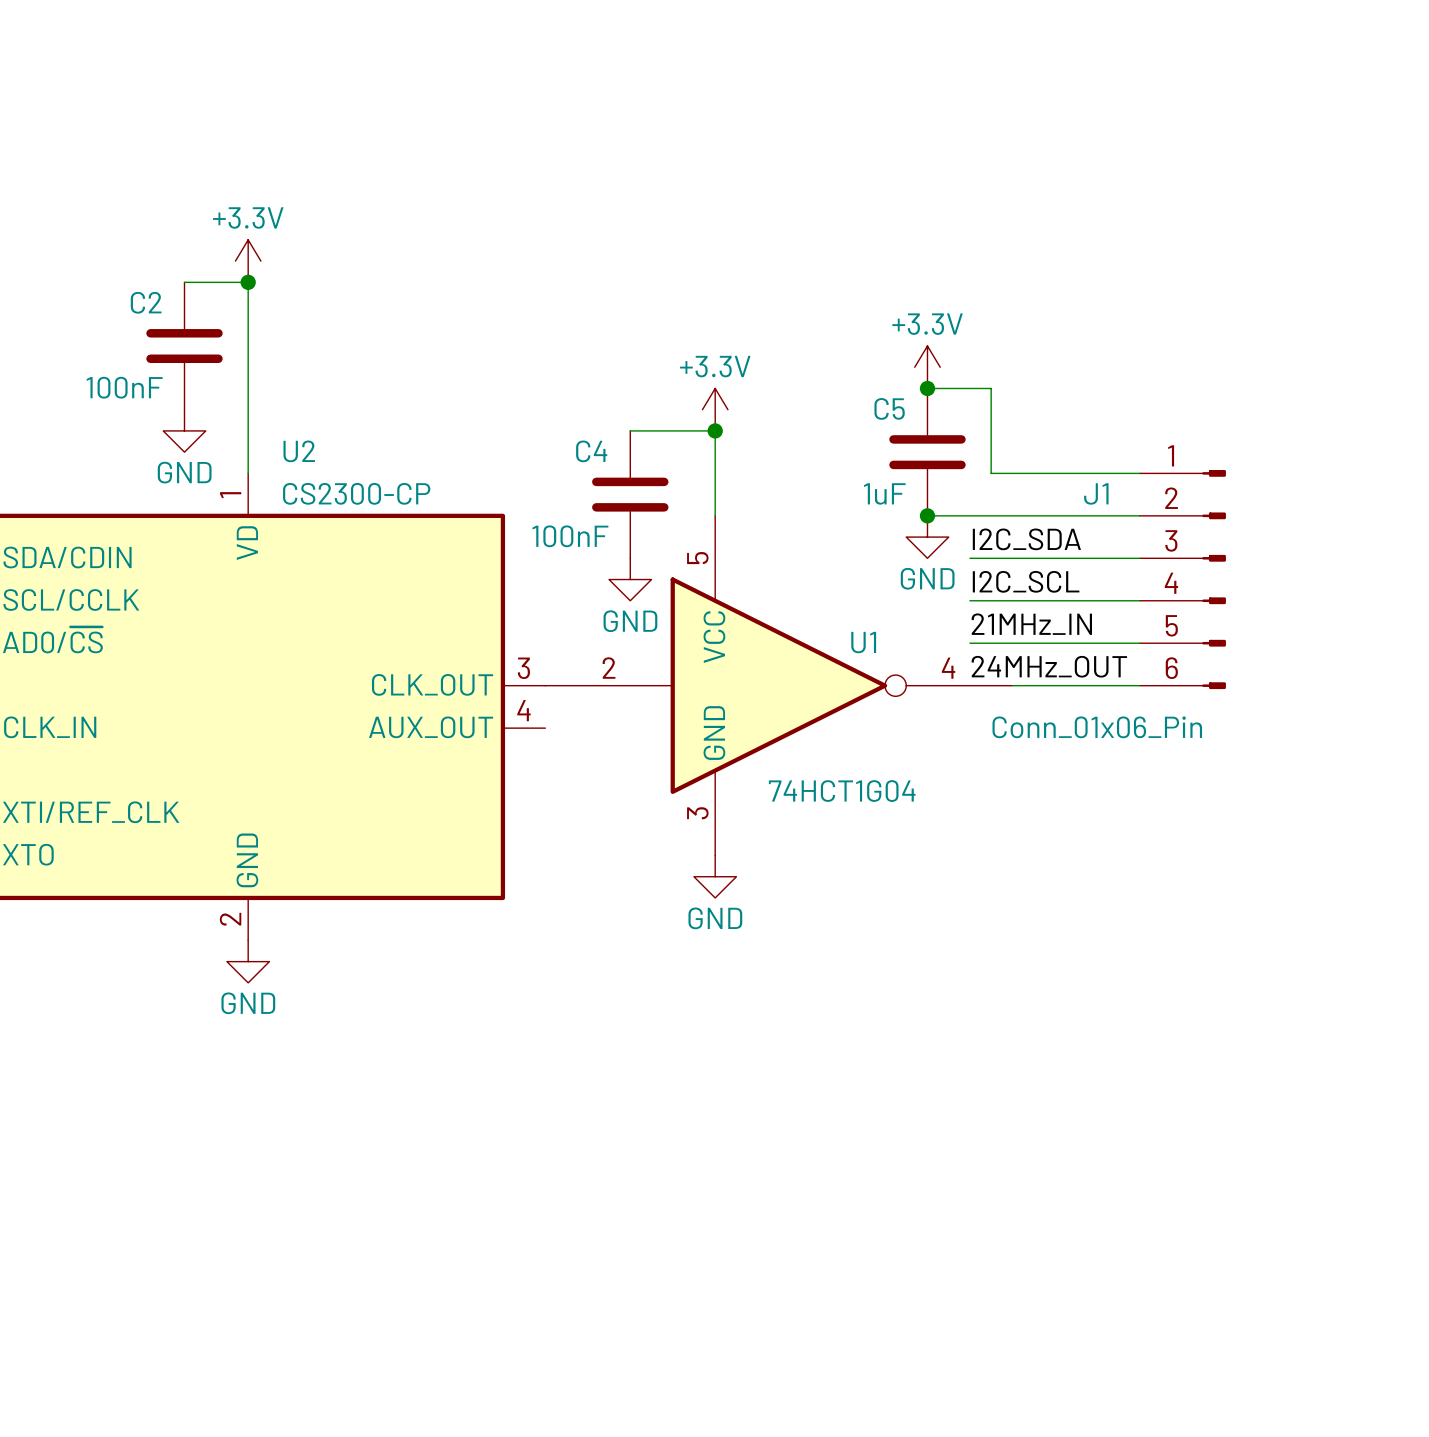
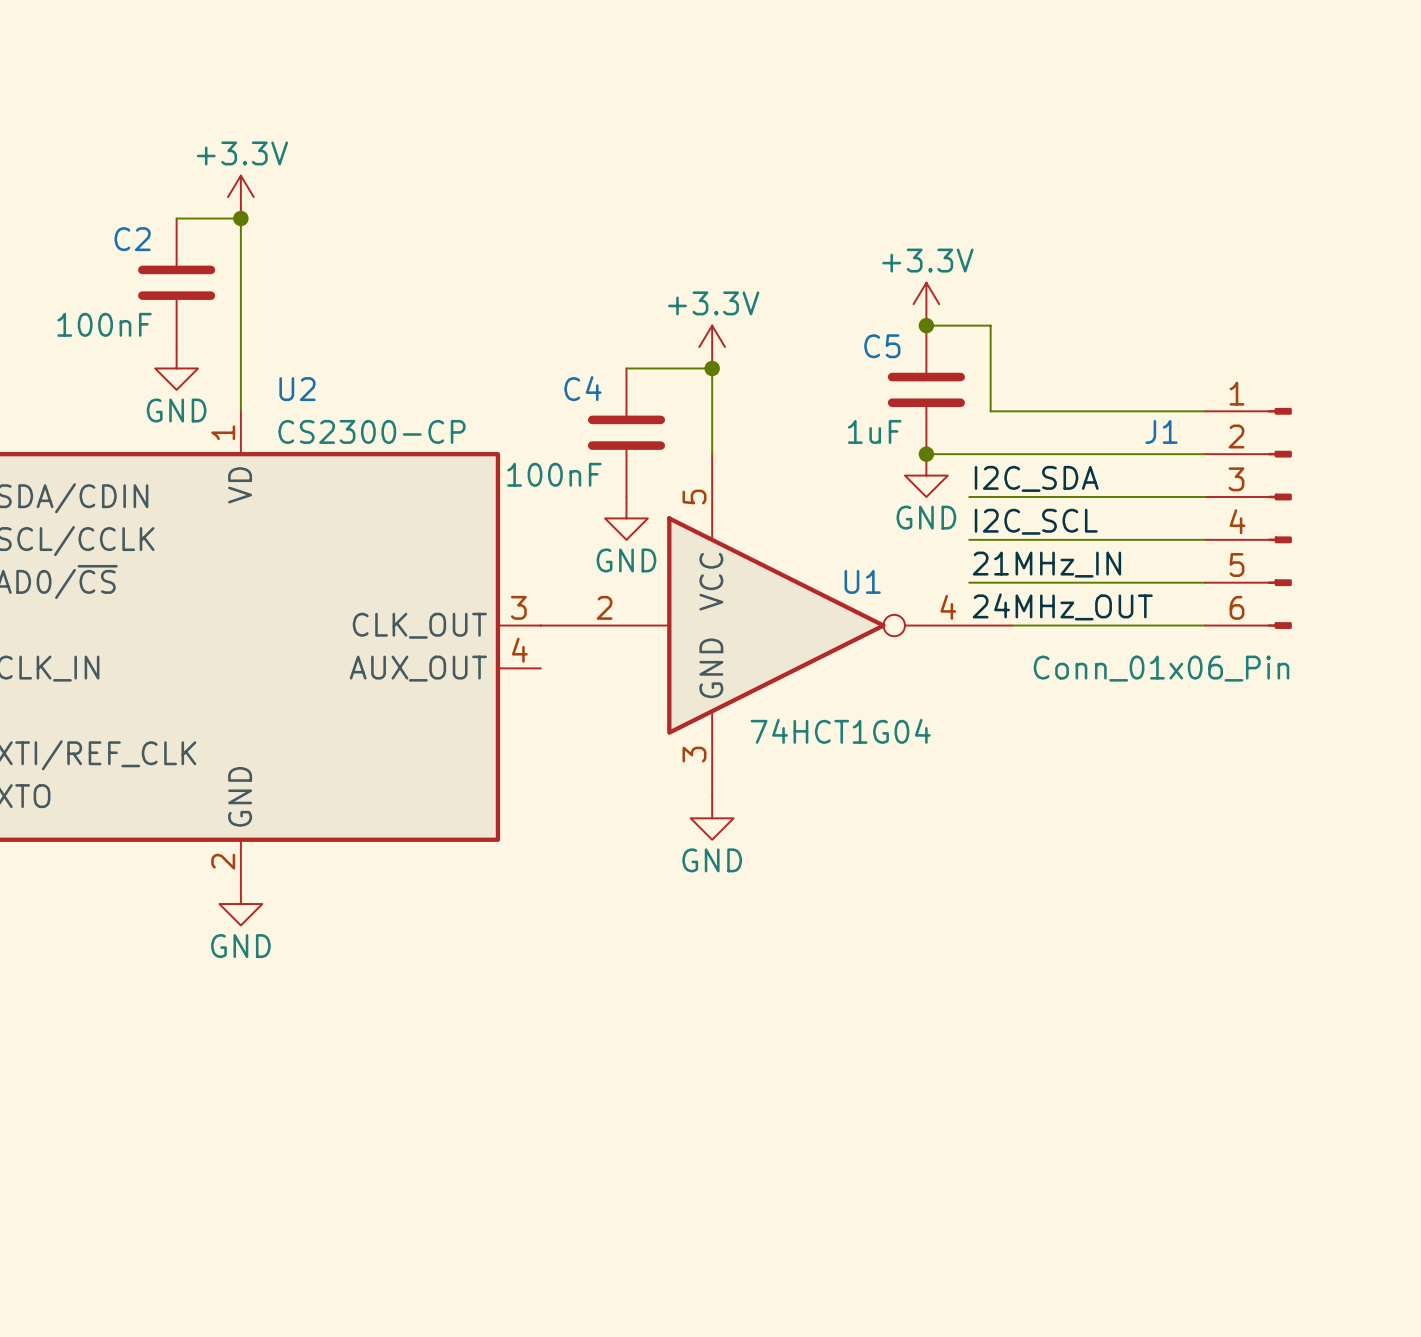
J1 position: (1182, 579) -> (1248, 518)

